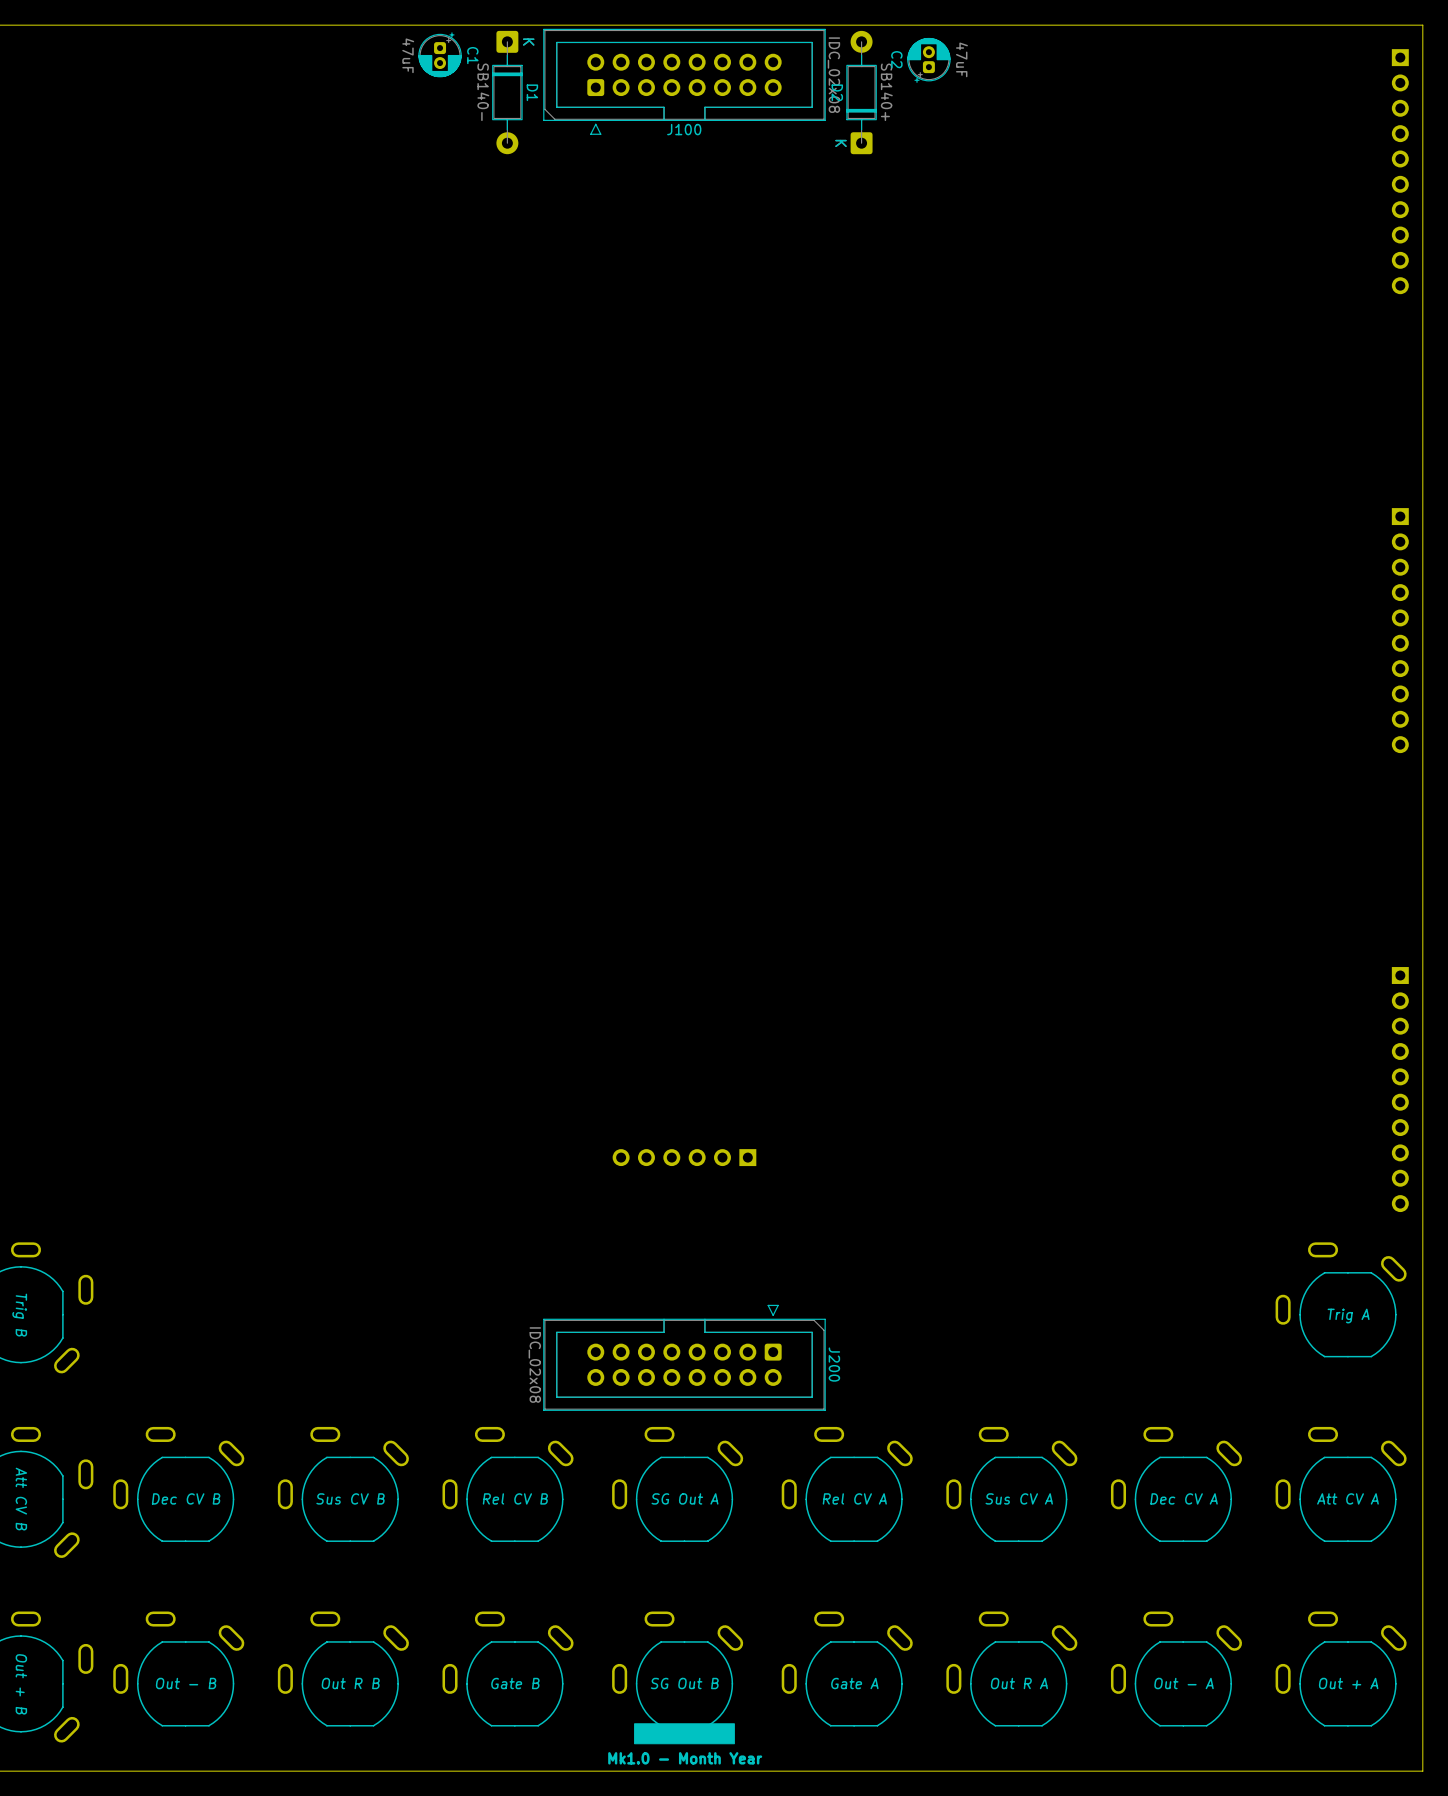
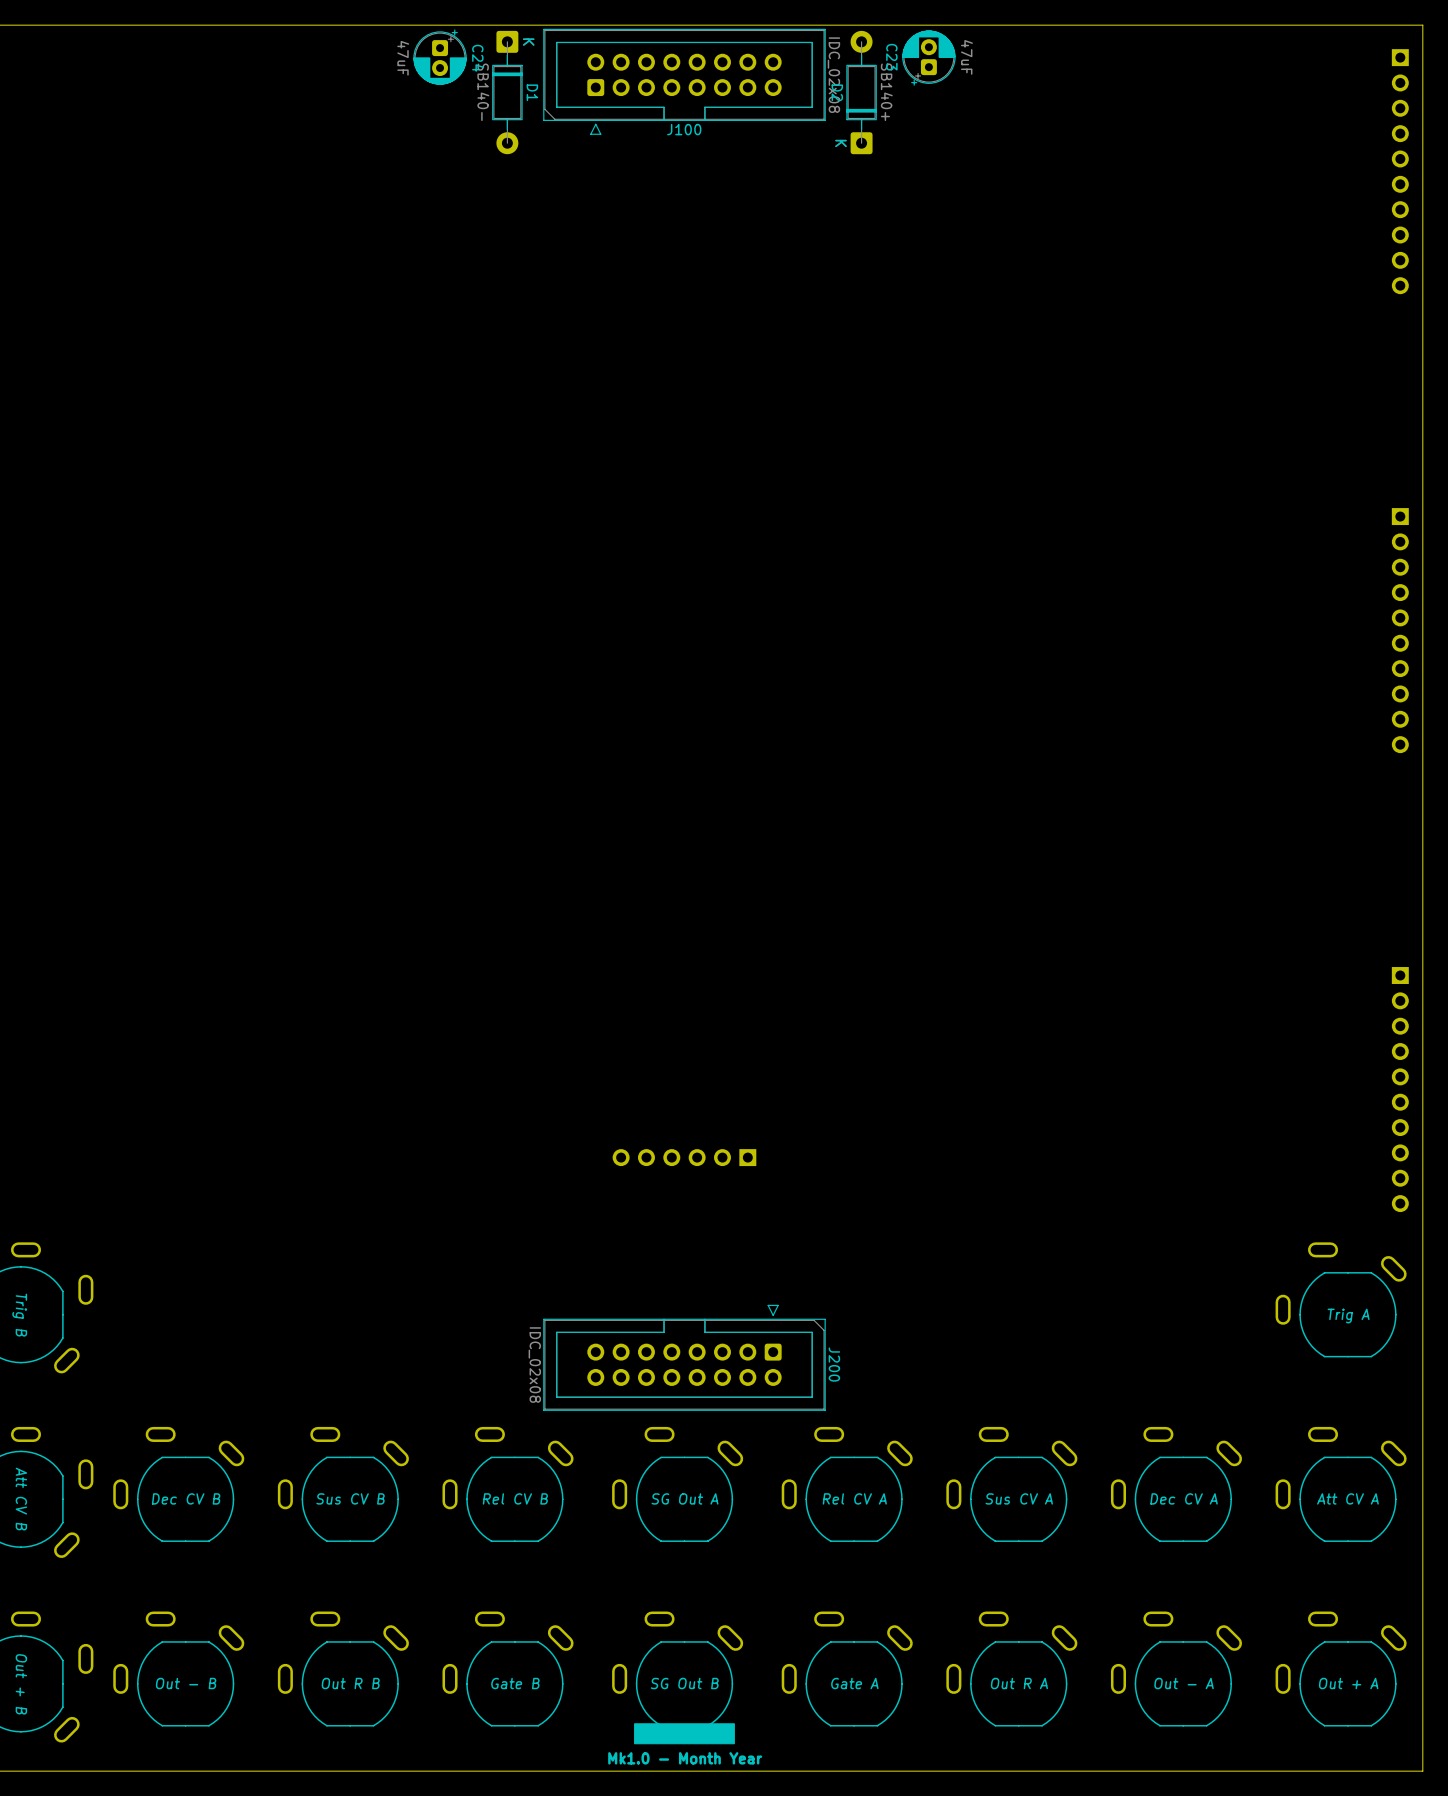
C1: 47uF (440, 54) -> none
C24: none -> 47uF (440, 57)
C23: none -> 47uF (928, 58)
C2: 47uF (928, 60) -> none

